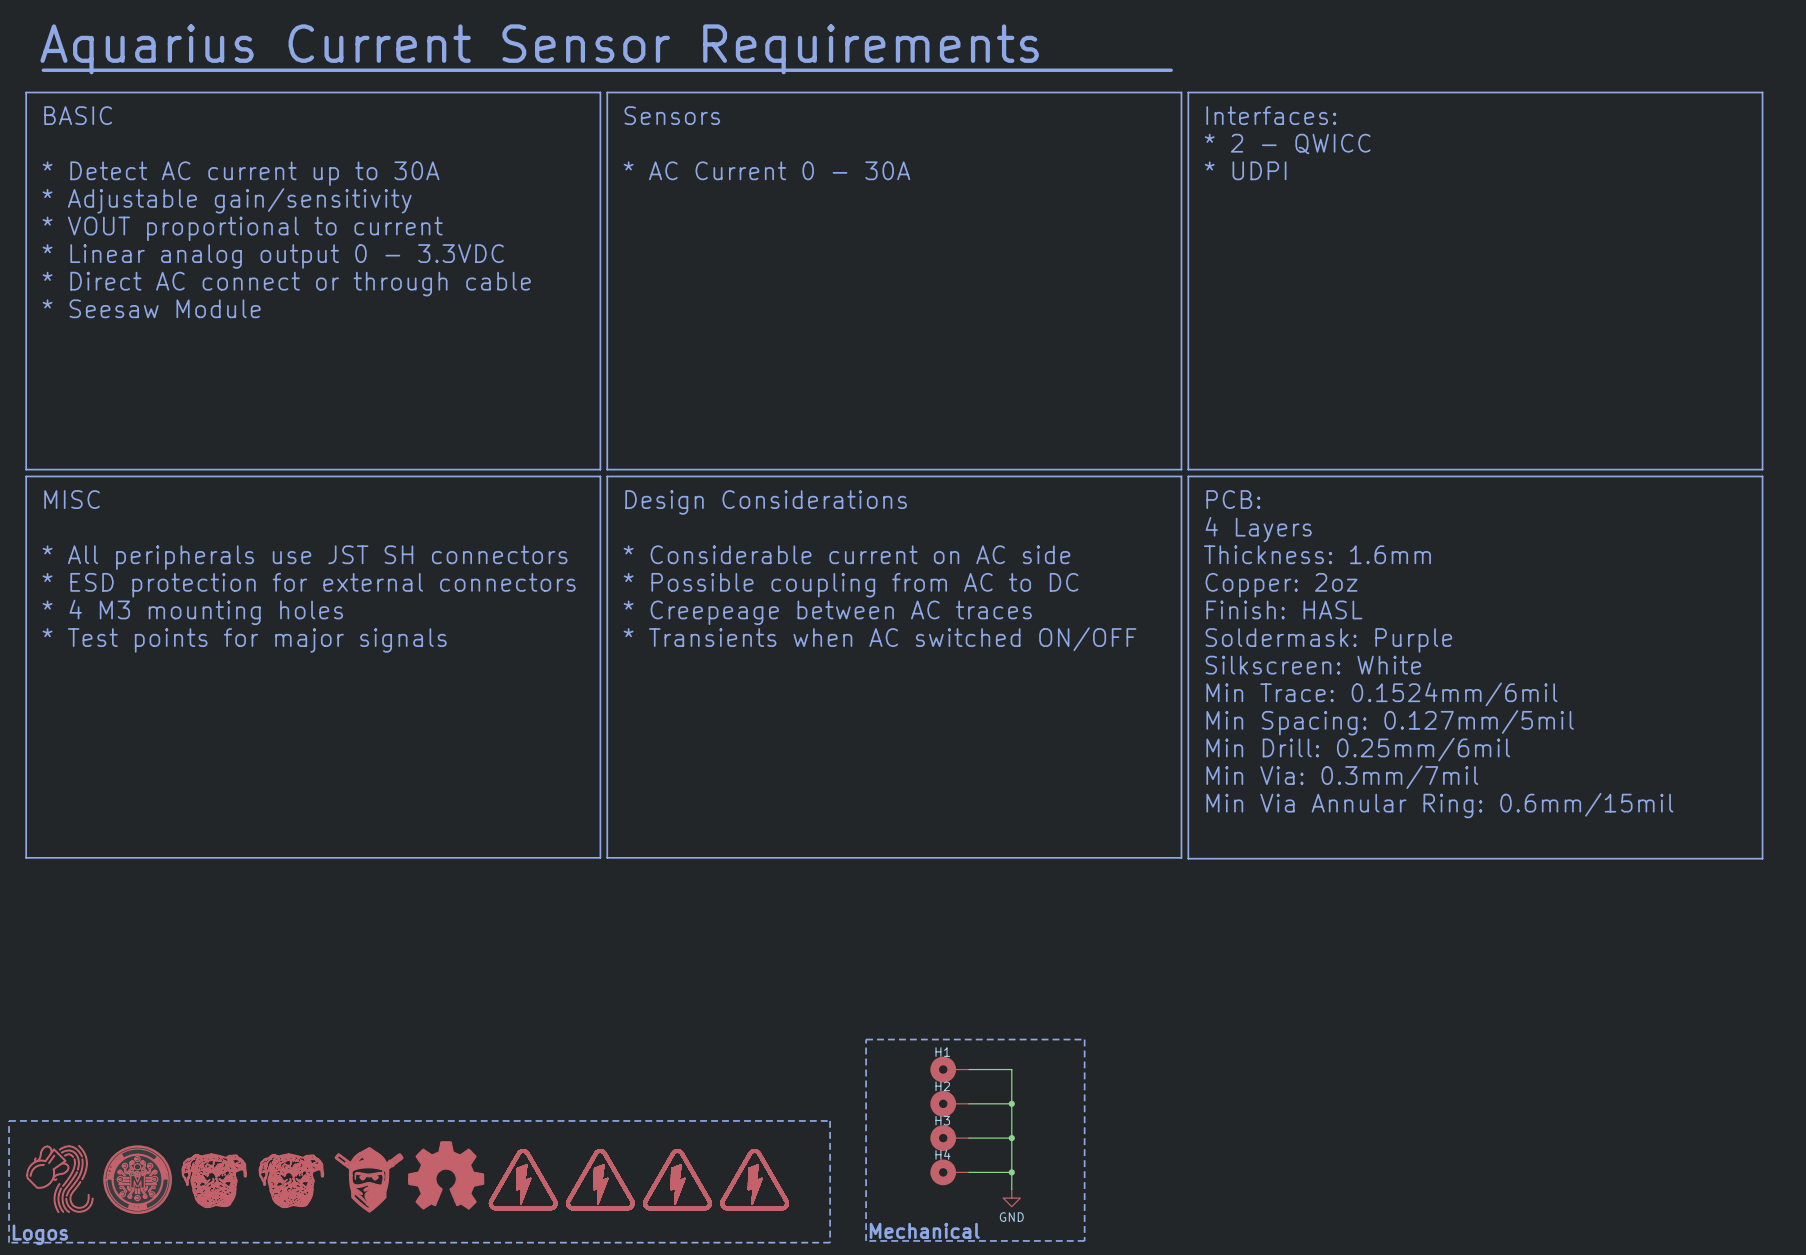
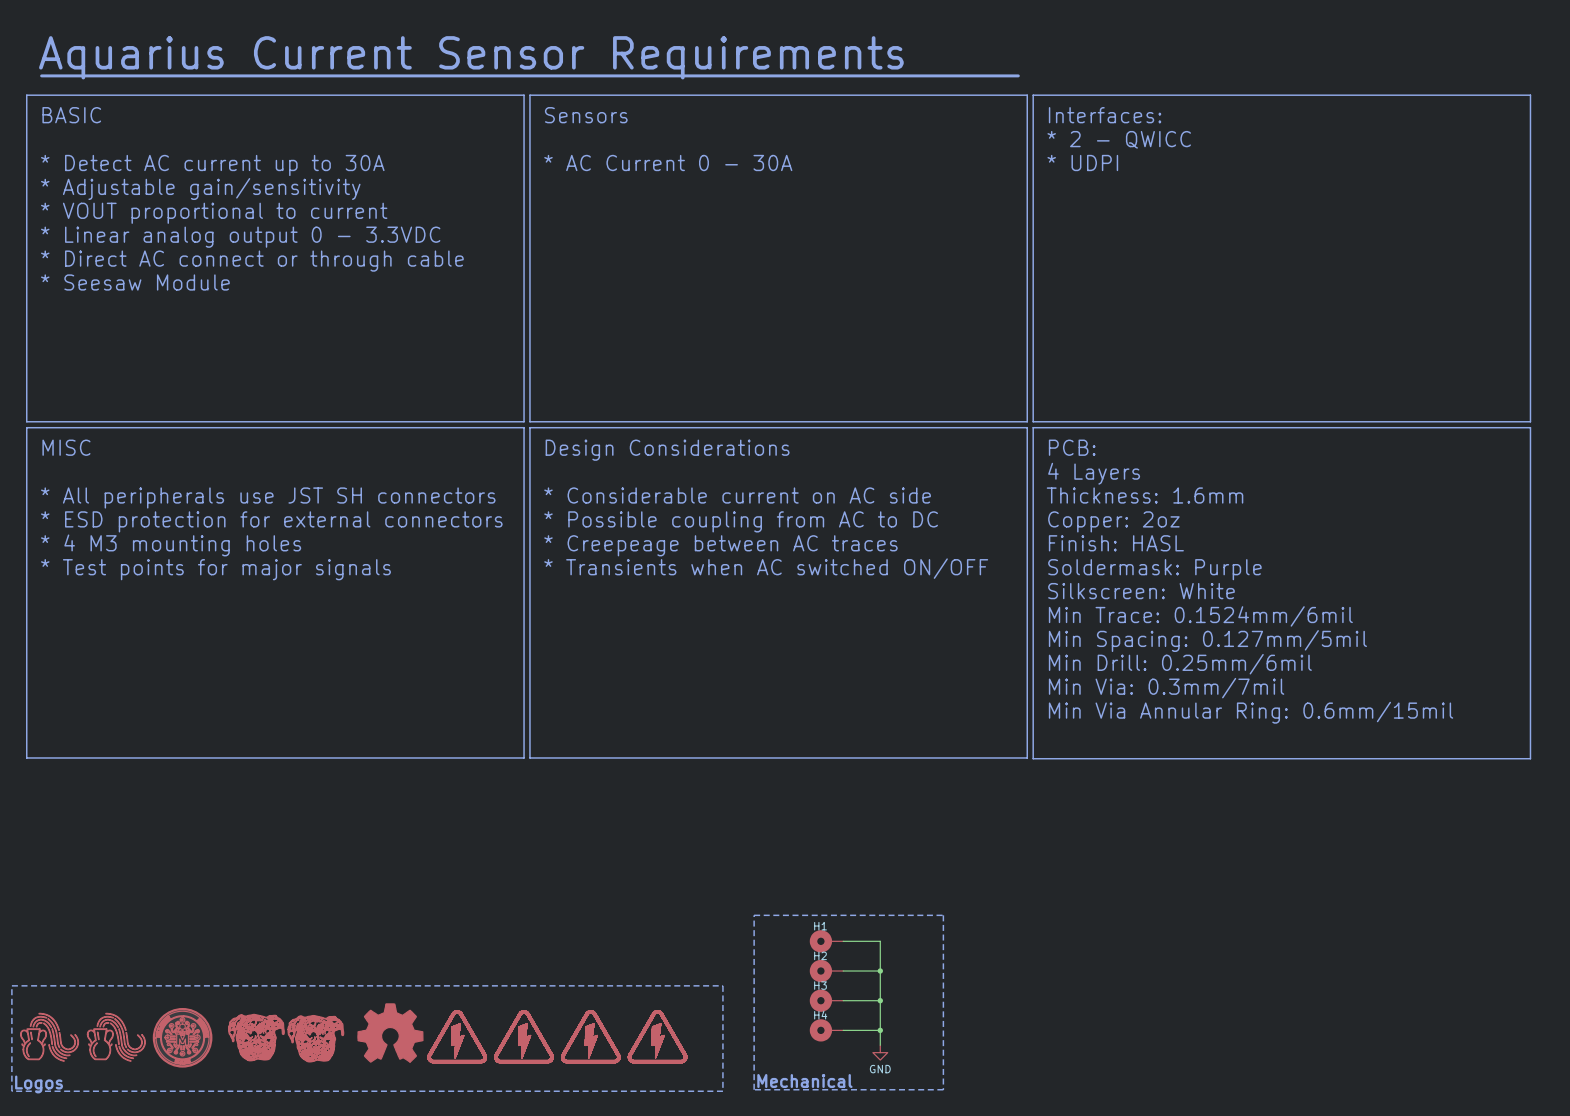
part: (59, 1179) -> none
part position: (137, 1179) -> (182, 1037)
part: (369, 1179) -> none
part: none -> (49, 1037)
part: none -> (116, 1037)
part position: (214, 1180) -> (315, 1038)

